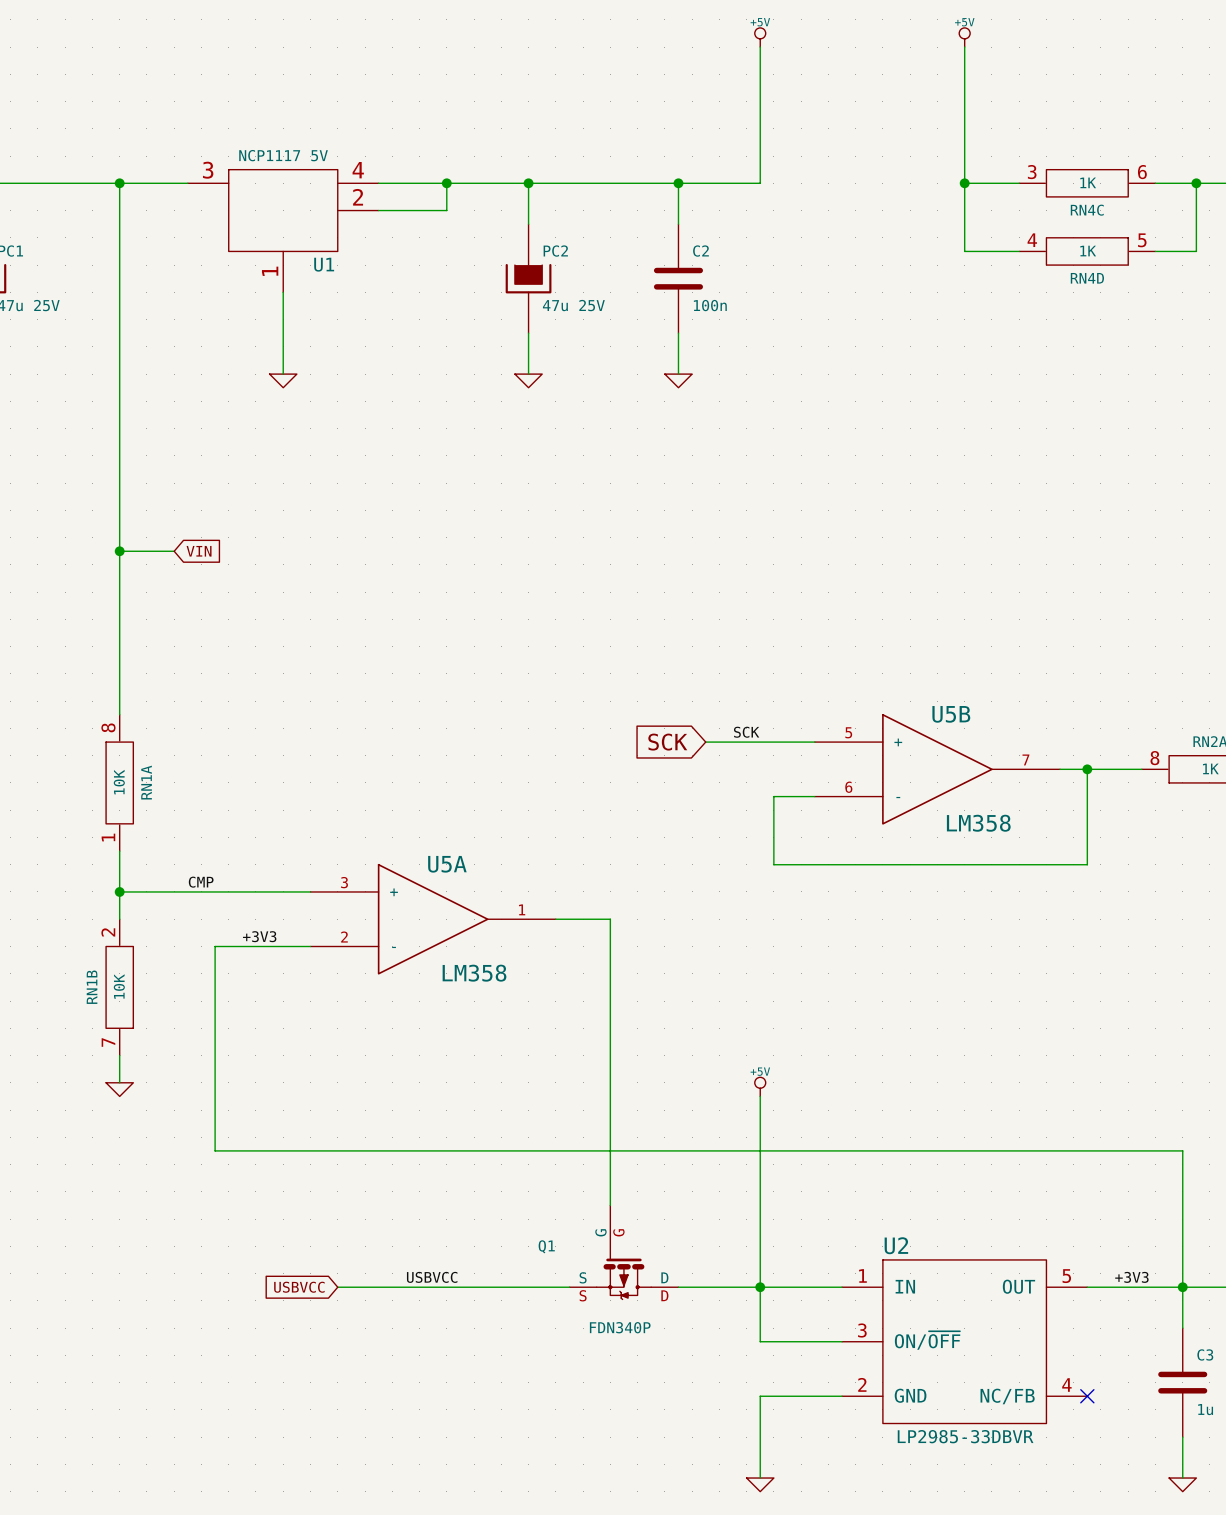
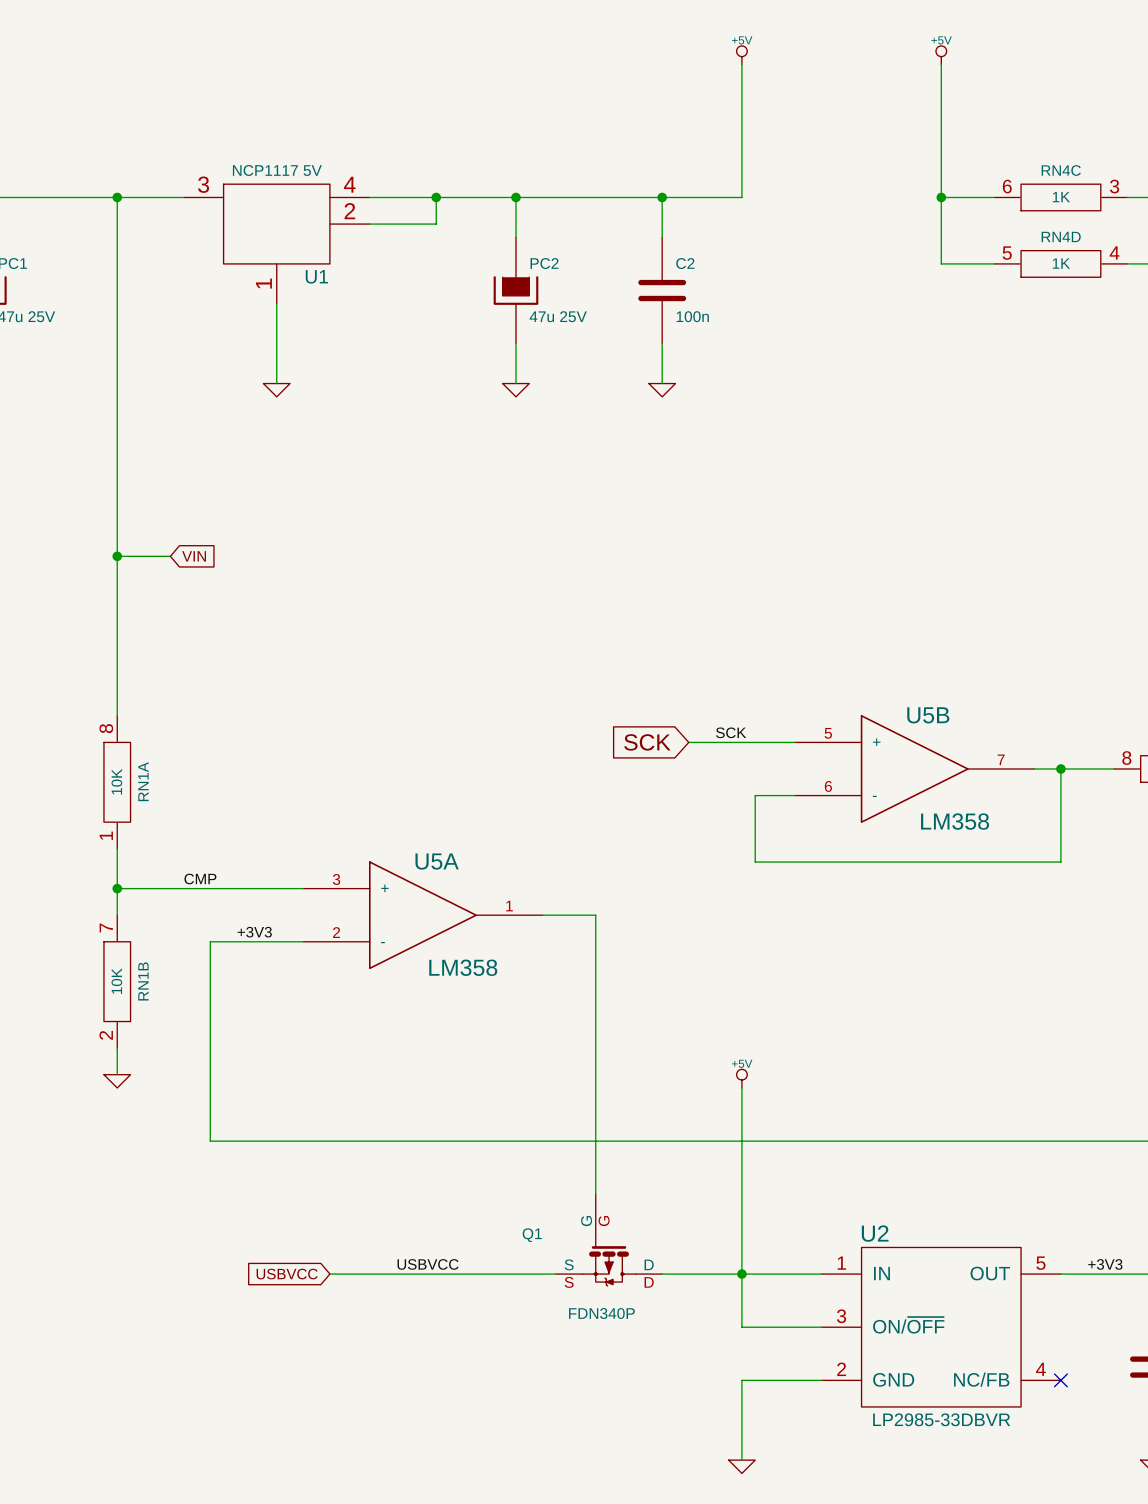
RN4C rotation: 0° (1087, 183) -> 180° (1060, 197)
RN4D rotation: 0° (1087, 251) -> 180° (1060, 263)
RN1B rotation: 0° (119, 987) -> 180° (117, 981)

